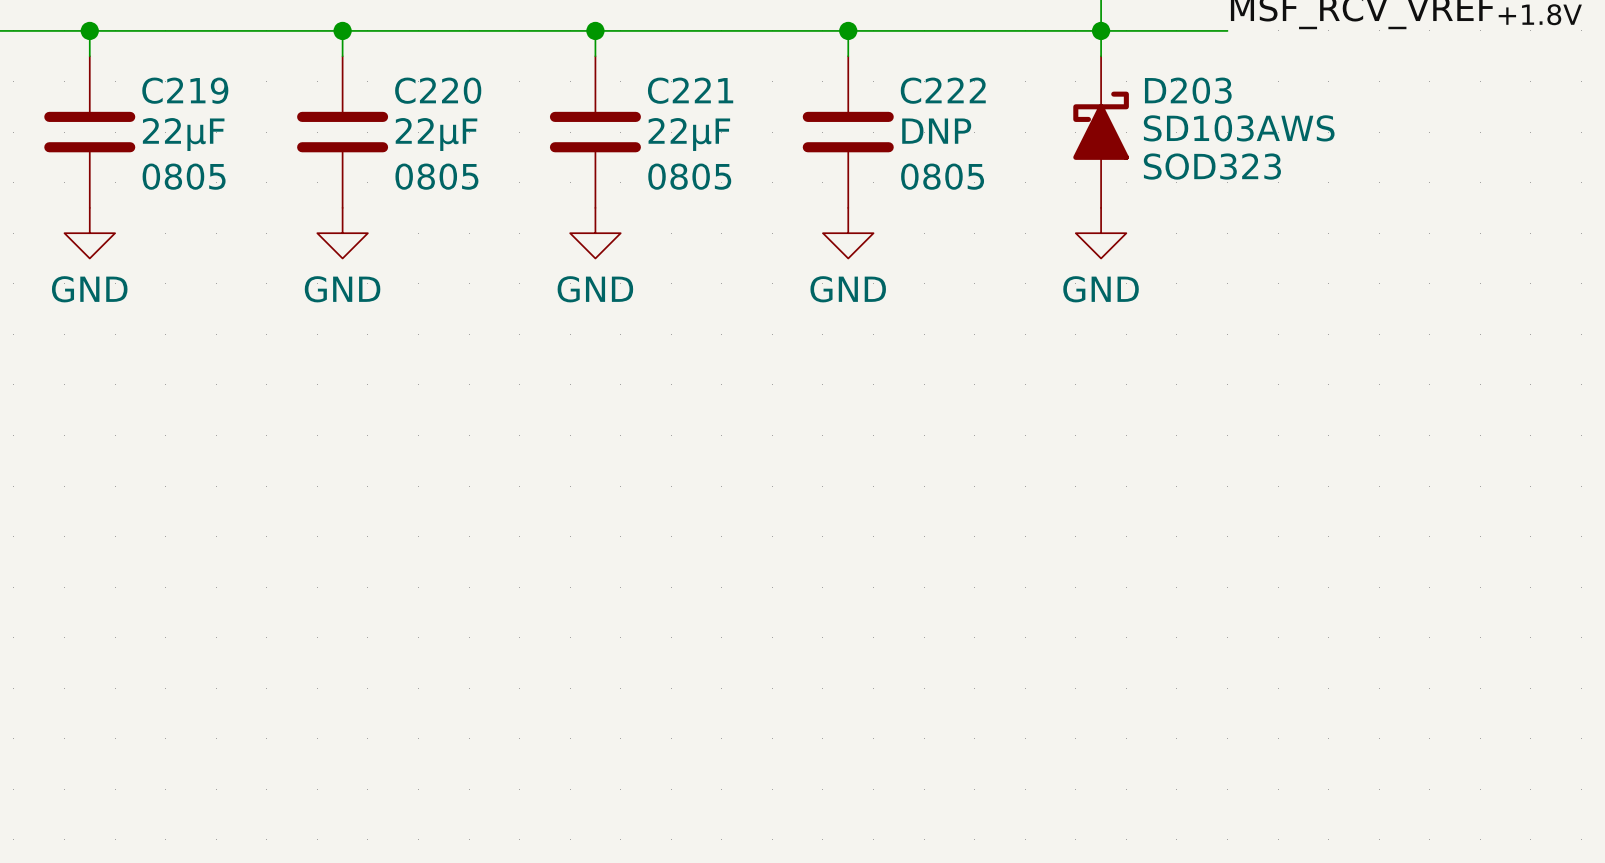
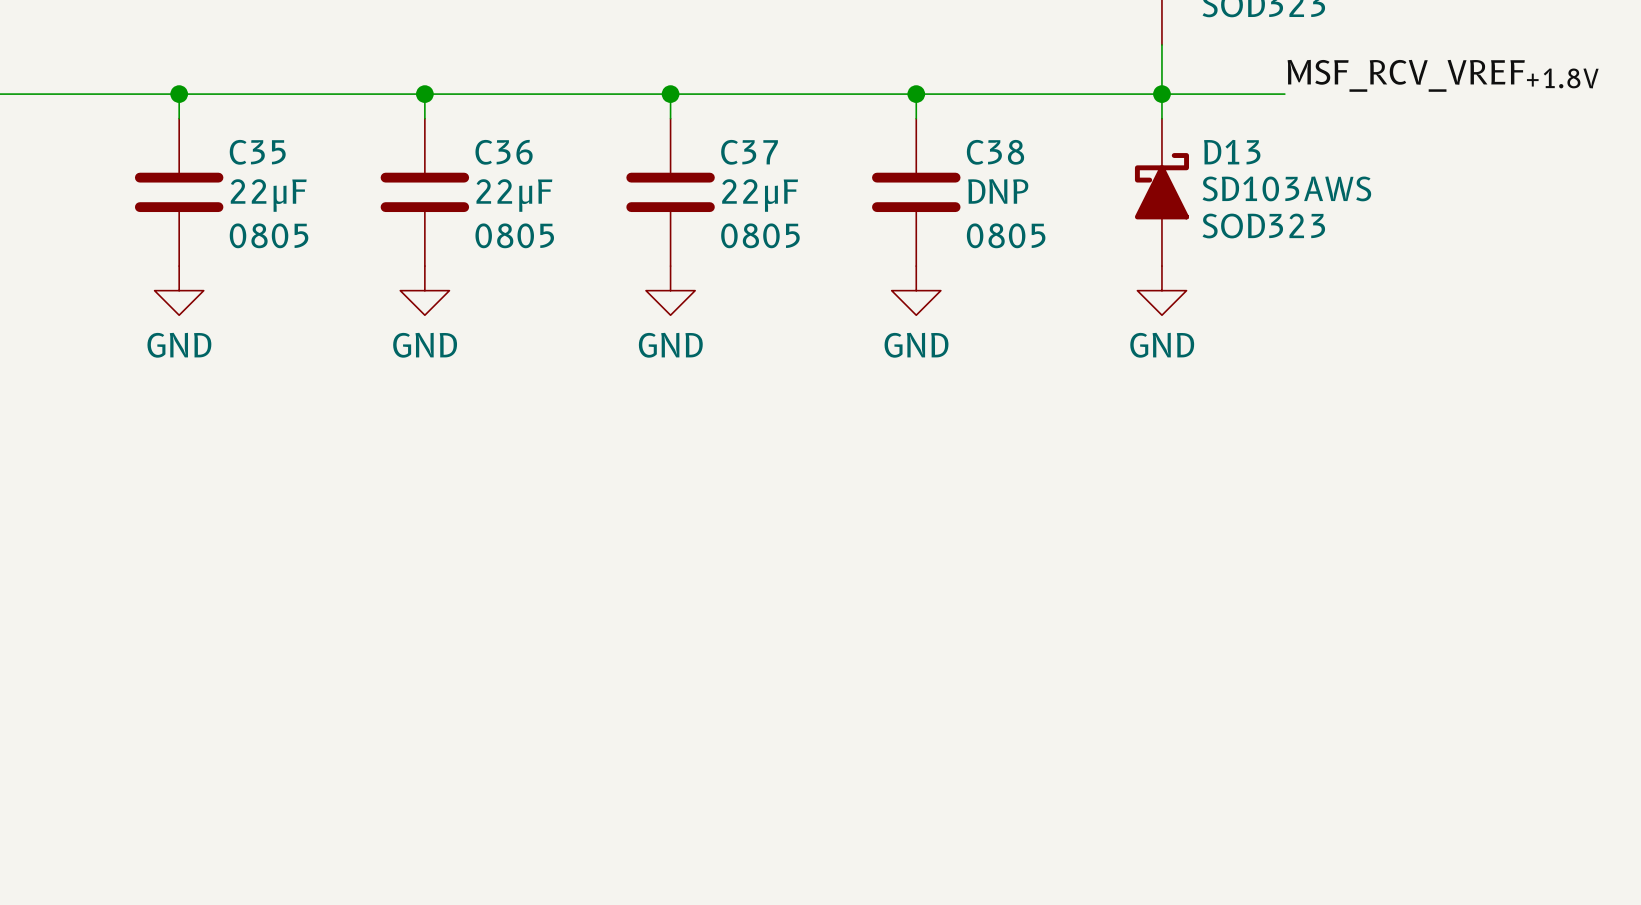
C219 name: C219 (185, 90) -> C35 (257, 152)
C220 name: C220 (438, 90) -> C36 (504, 152)
C221 name: C221 (690, 90) -> C37 (749, 152)
C222 name: C222 (943, 90) -> C38 (995, 152)
D203 name: D203 (1188, 90) -> D13 (1232, 152)

